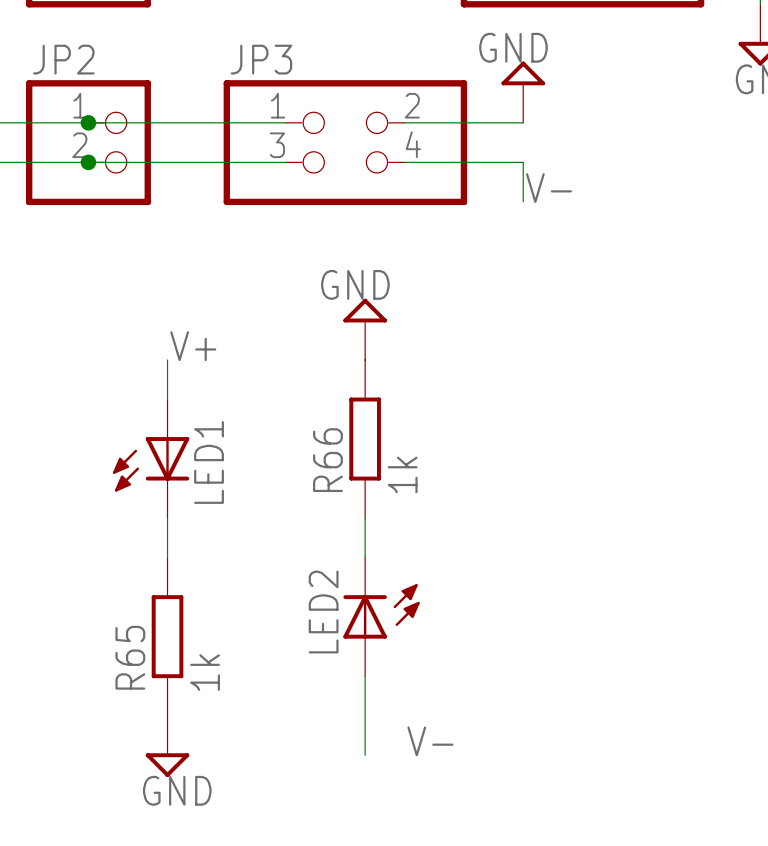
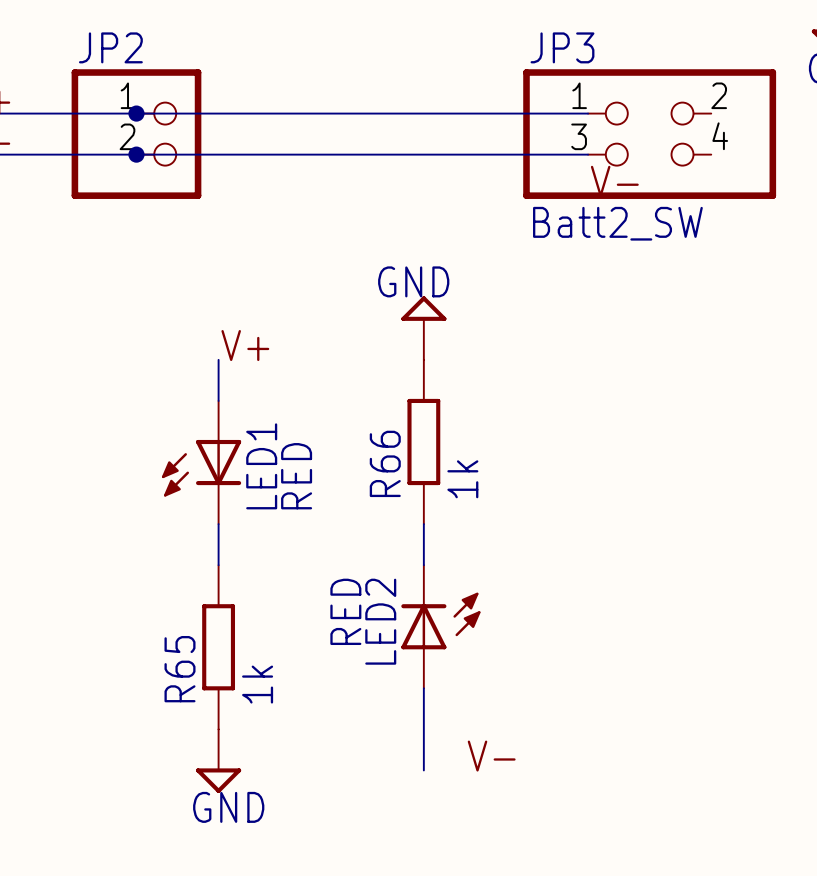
power symbol: GND (523, 92) -> none
wire: none -> (341, 113) (464, 113)
JP3 position: (345, 142) -> (649, 134)
wire: none -> (341, 154) (464, 154)
wire: (523, 162) (523, 201) -> none
JP3 value: none -> Batt2_SW (617, 223)
LED1 value: none -> RED (296, 476)
LED2 value: none -> RED (345, 611)

